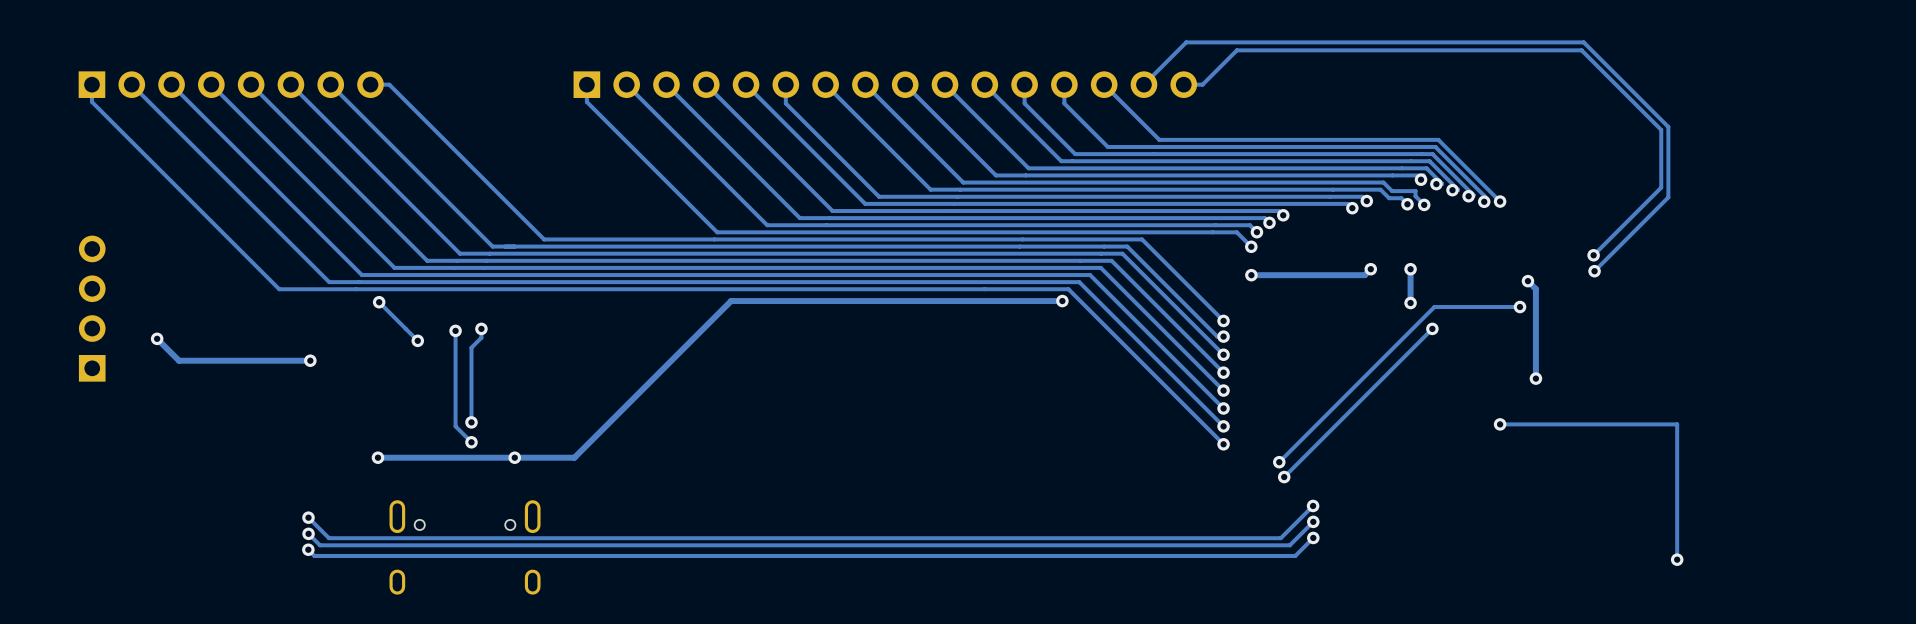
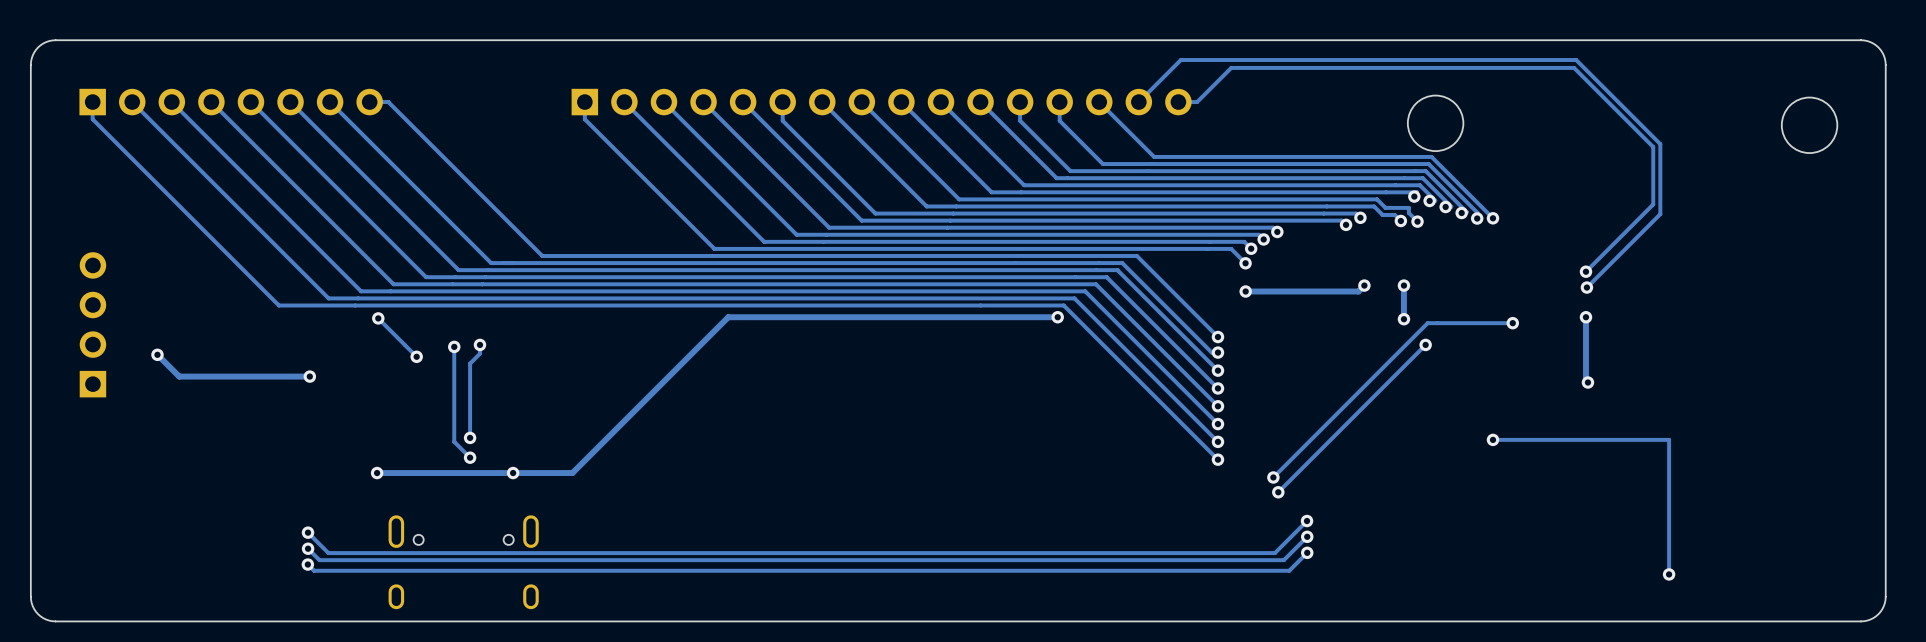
board edge: none -> (55, 40) (46, 42) (38, 47) (32, 55) (30, 64) (30, 596) (35, 611) (49, 620) (1861, 621) (1876, 616) (1884, 603) (1885, 64) (1880, 49) (1867, 41) (55, 40)
round board edge: none -> [1407, 95, 1464, 152]
round board edge: none -> [1781, 97, 1838, 154]
track: (1527, 281) (1535, 289) (1535, 378) -> none
via: (1527, 281) -> none
track: none -> (1585, 317) (1585, 380) (1587, 382)
via: none -> (1585, 317)
via: none -> (1587, 382)
via: (1535, 378) -> none

